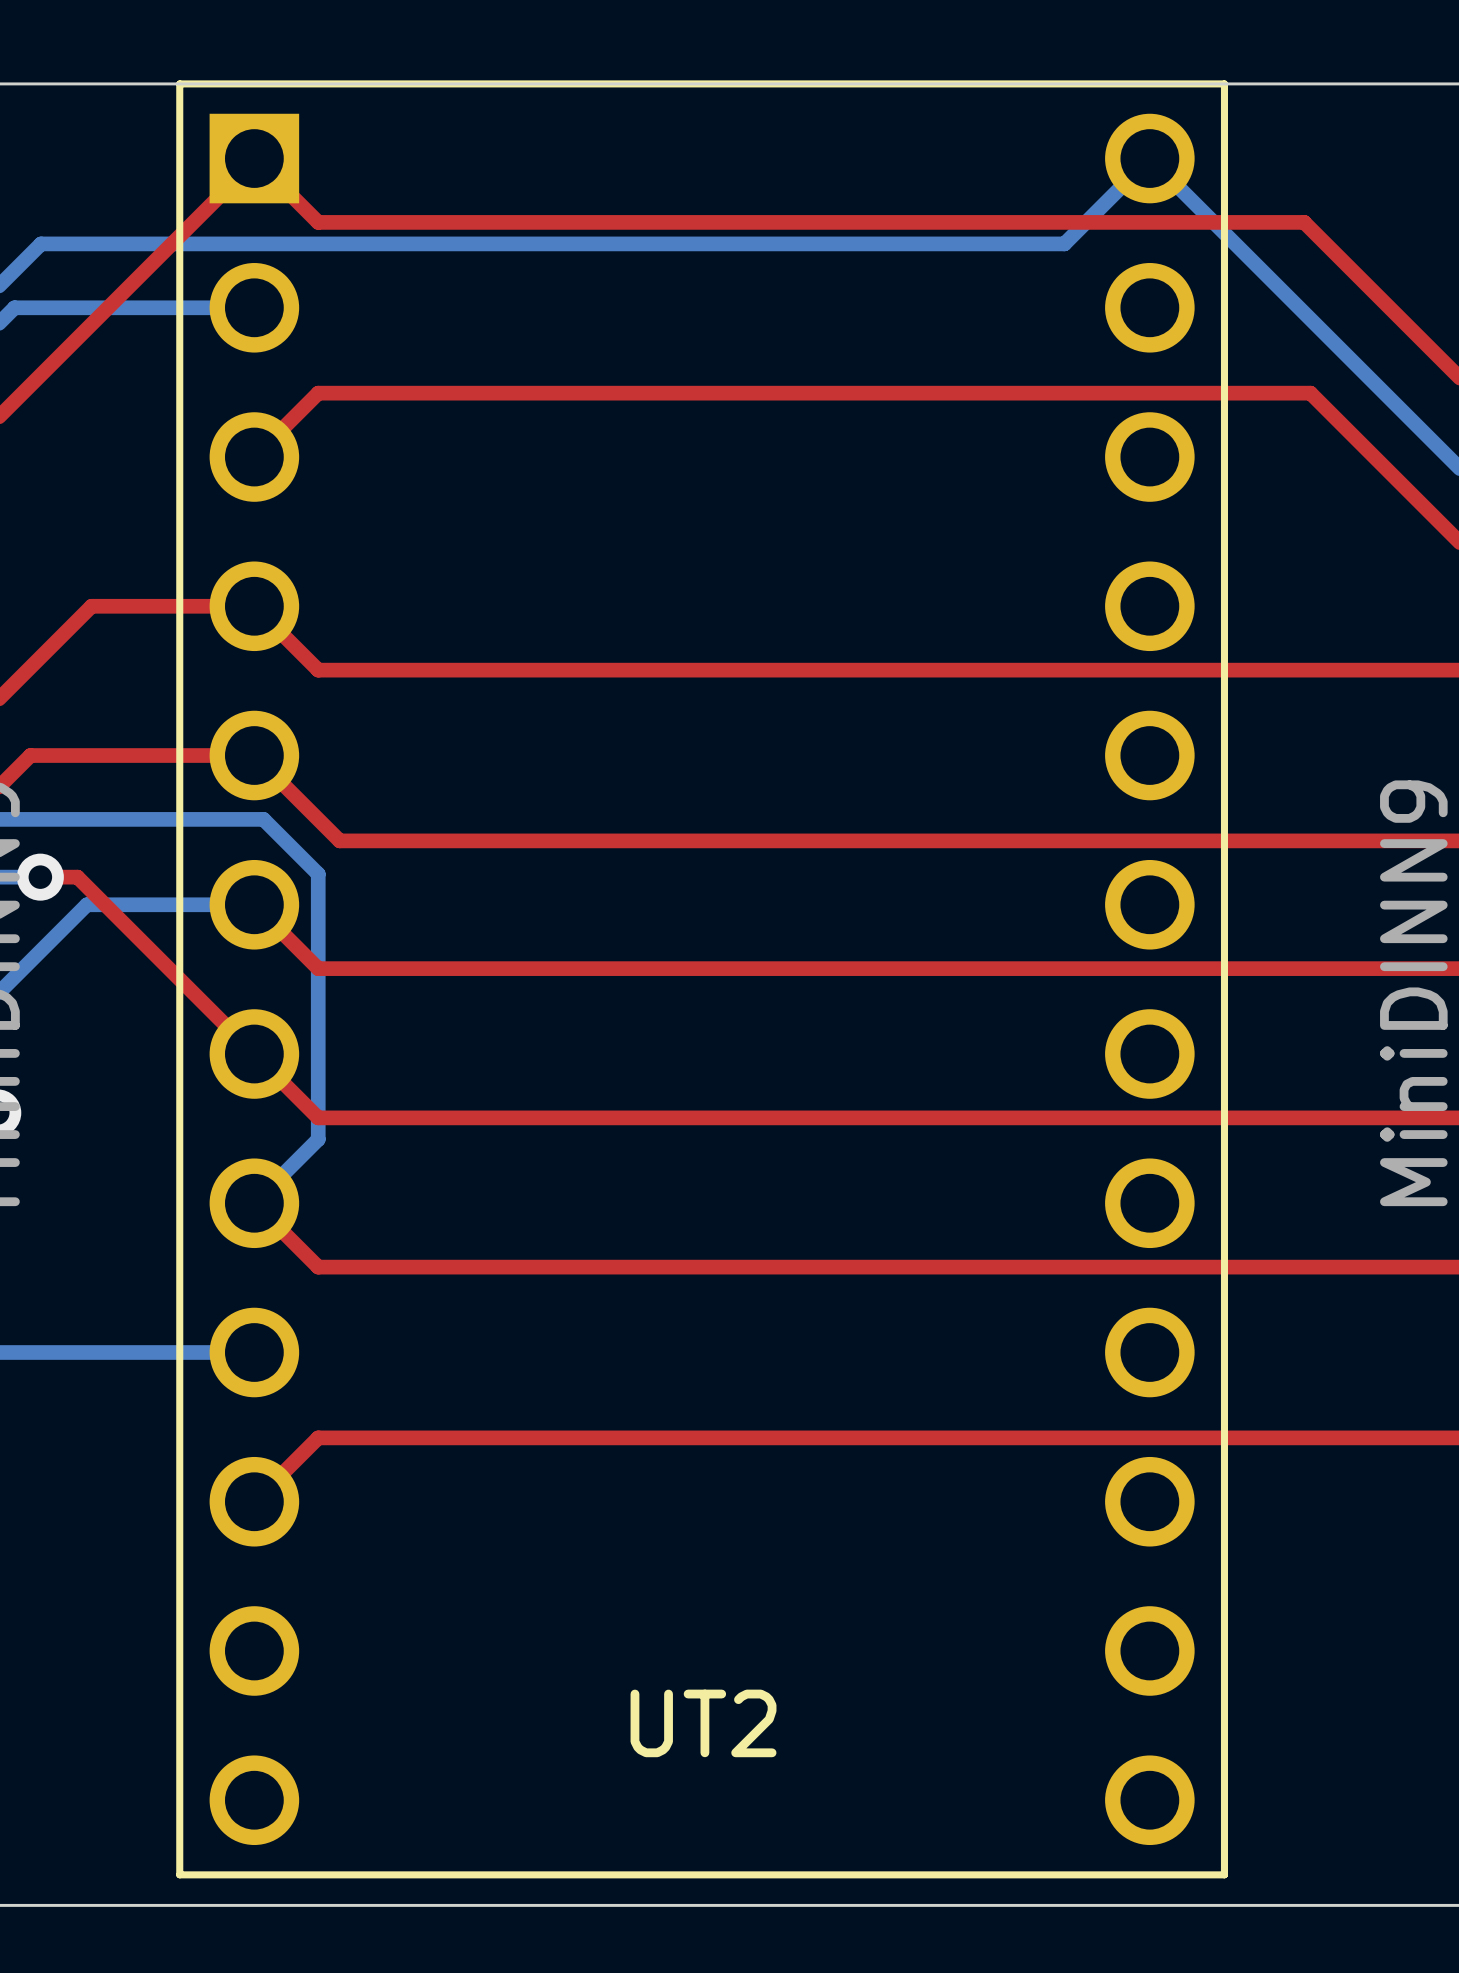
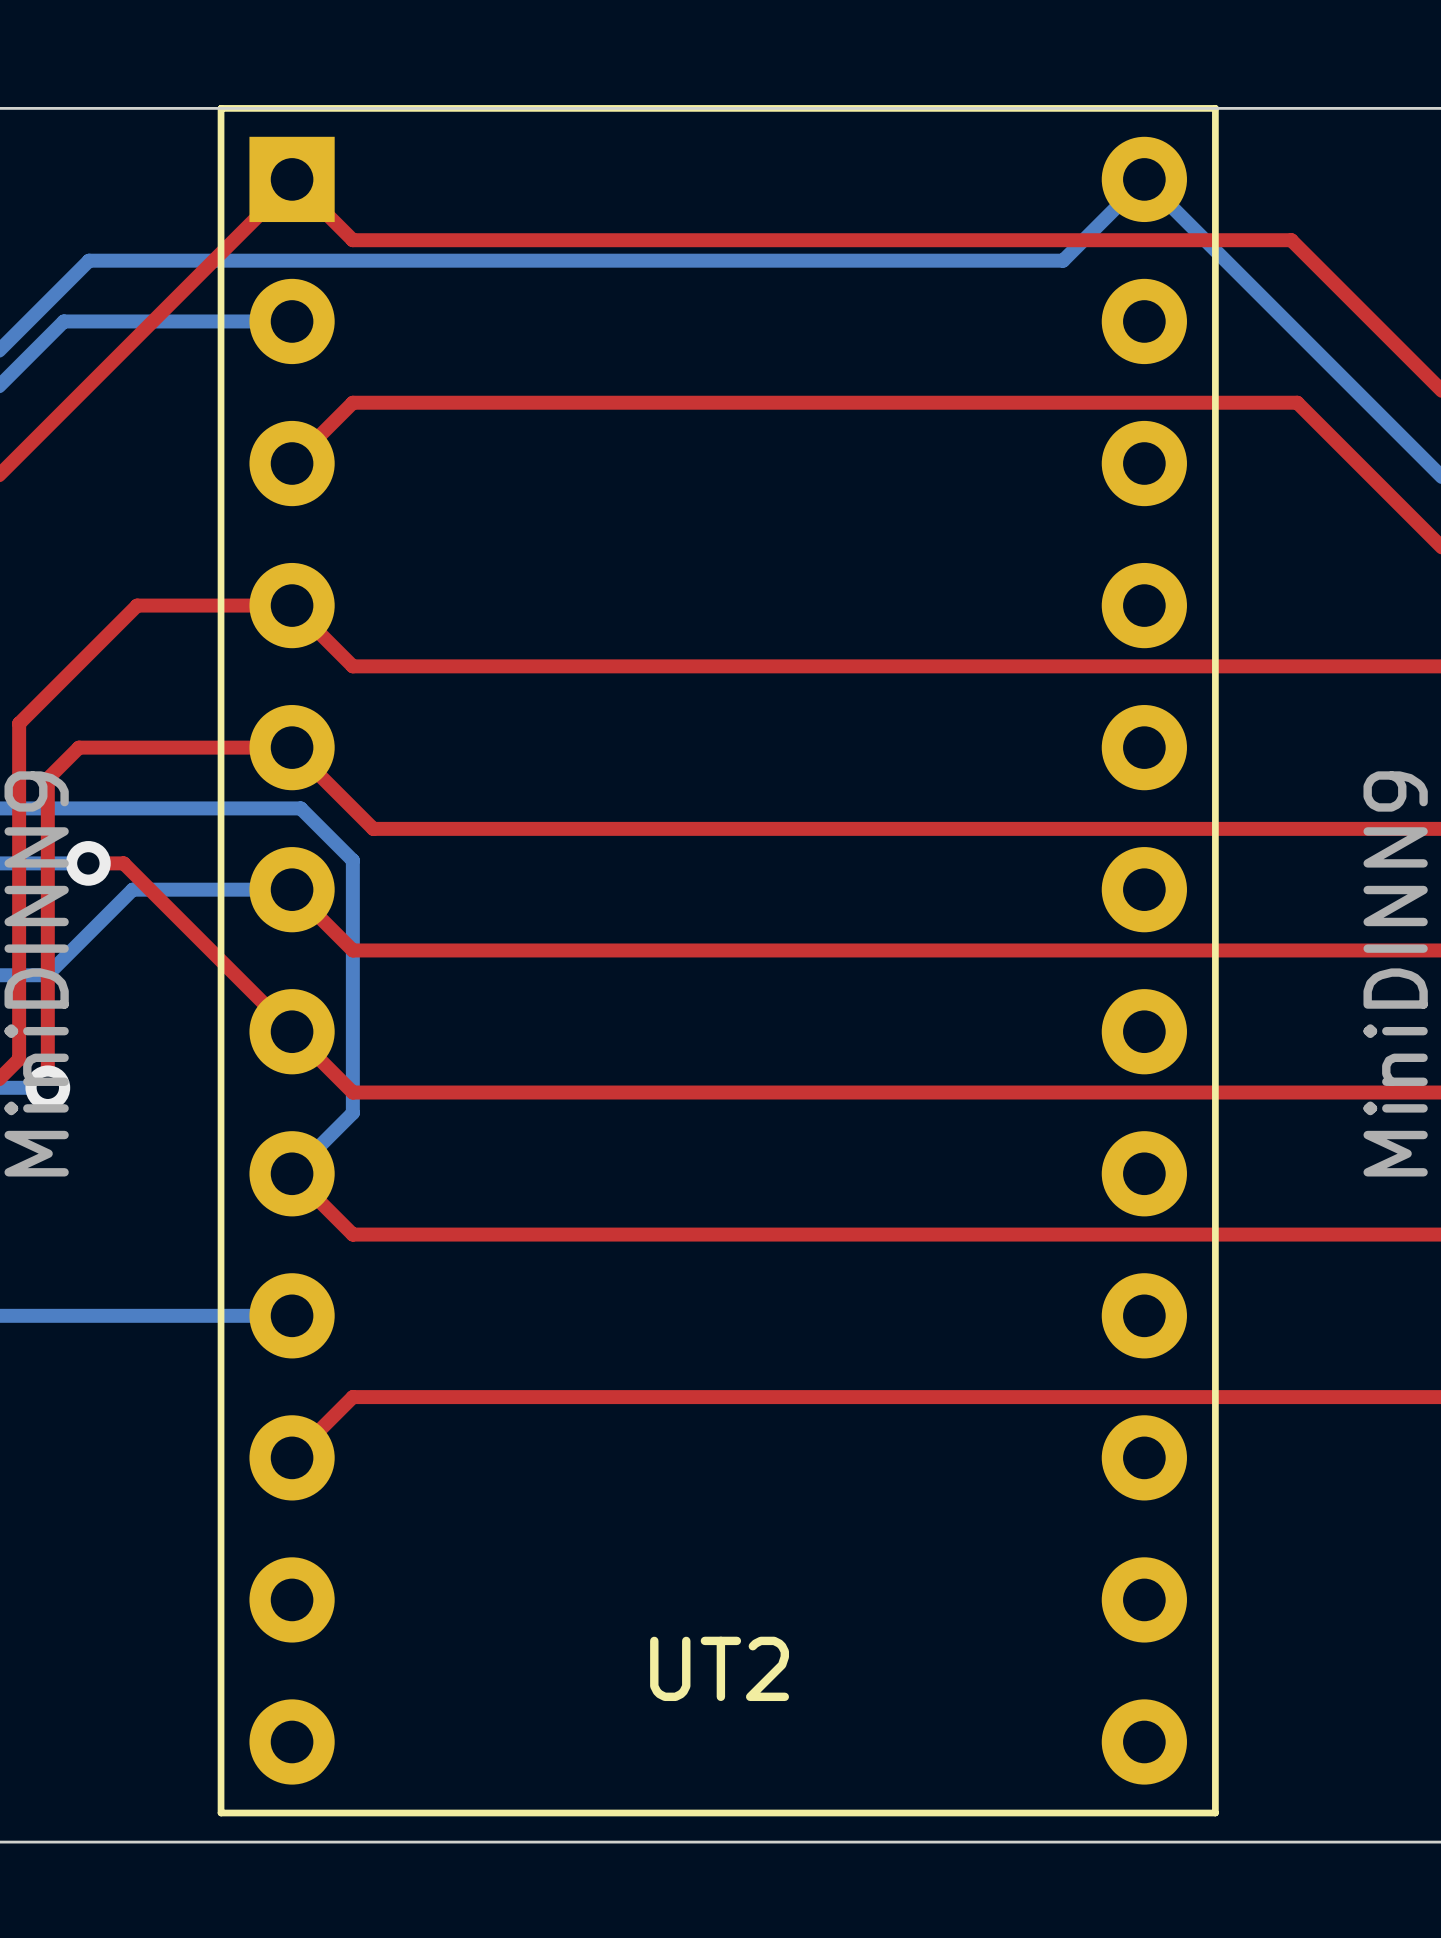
UT2 footprint: [176, 80, 1229, 1879] -> [217, 105, 1219, 1817]

